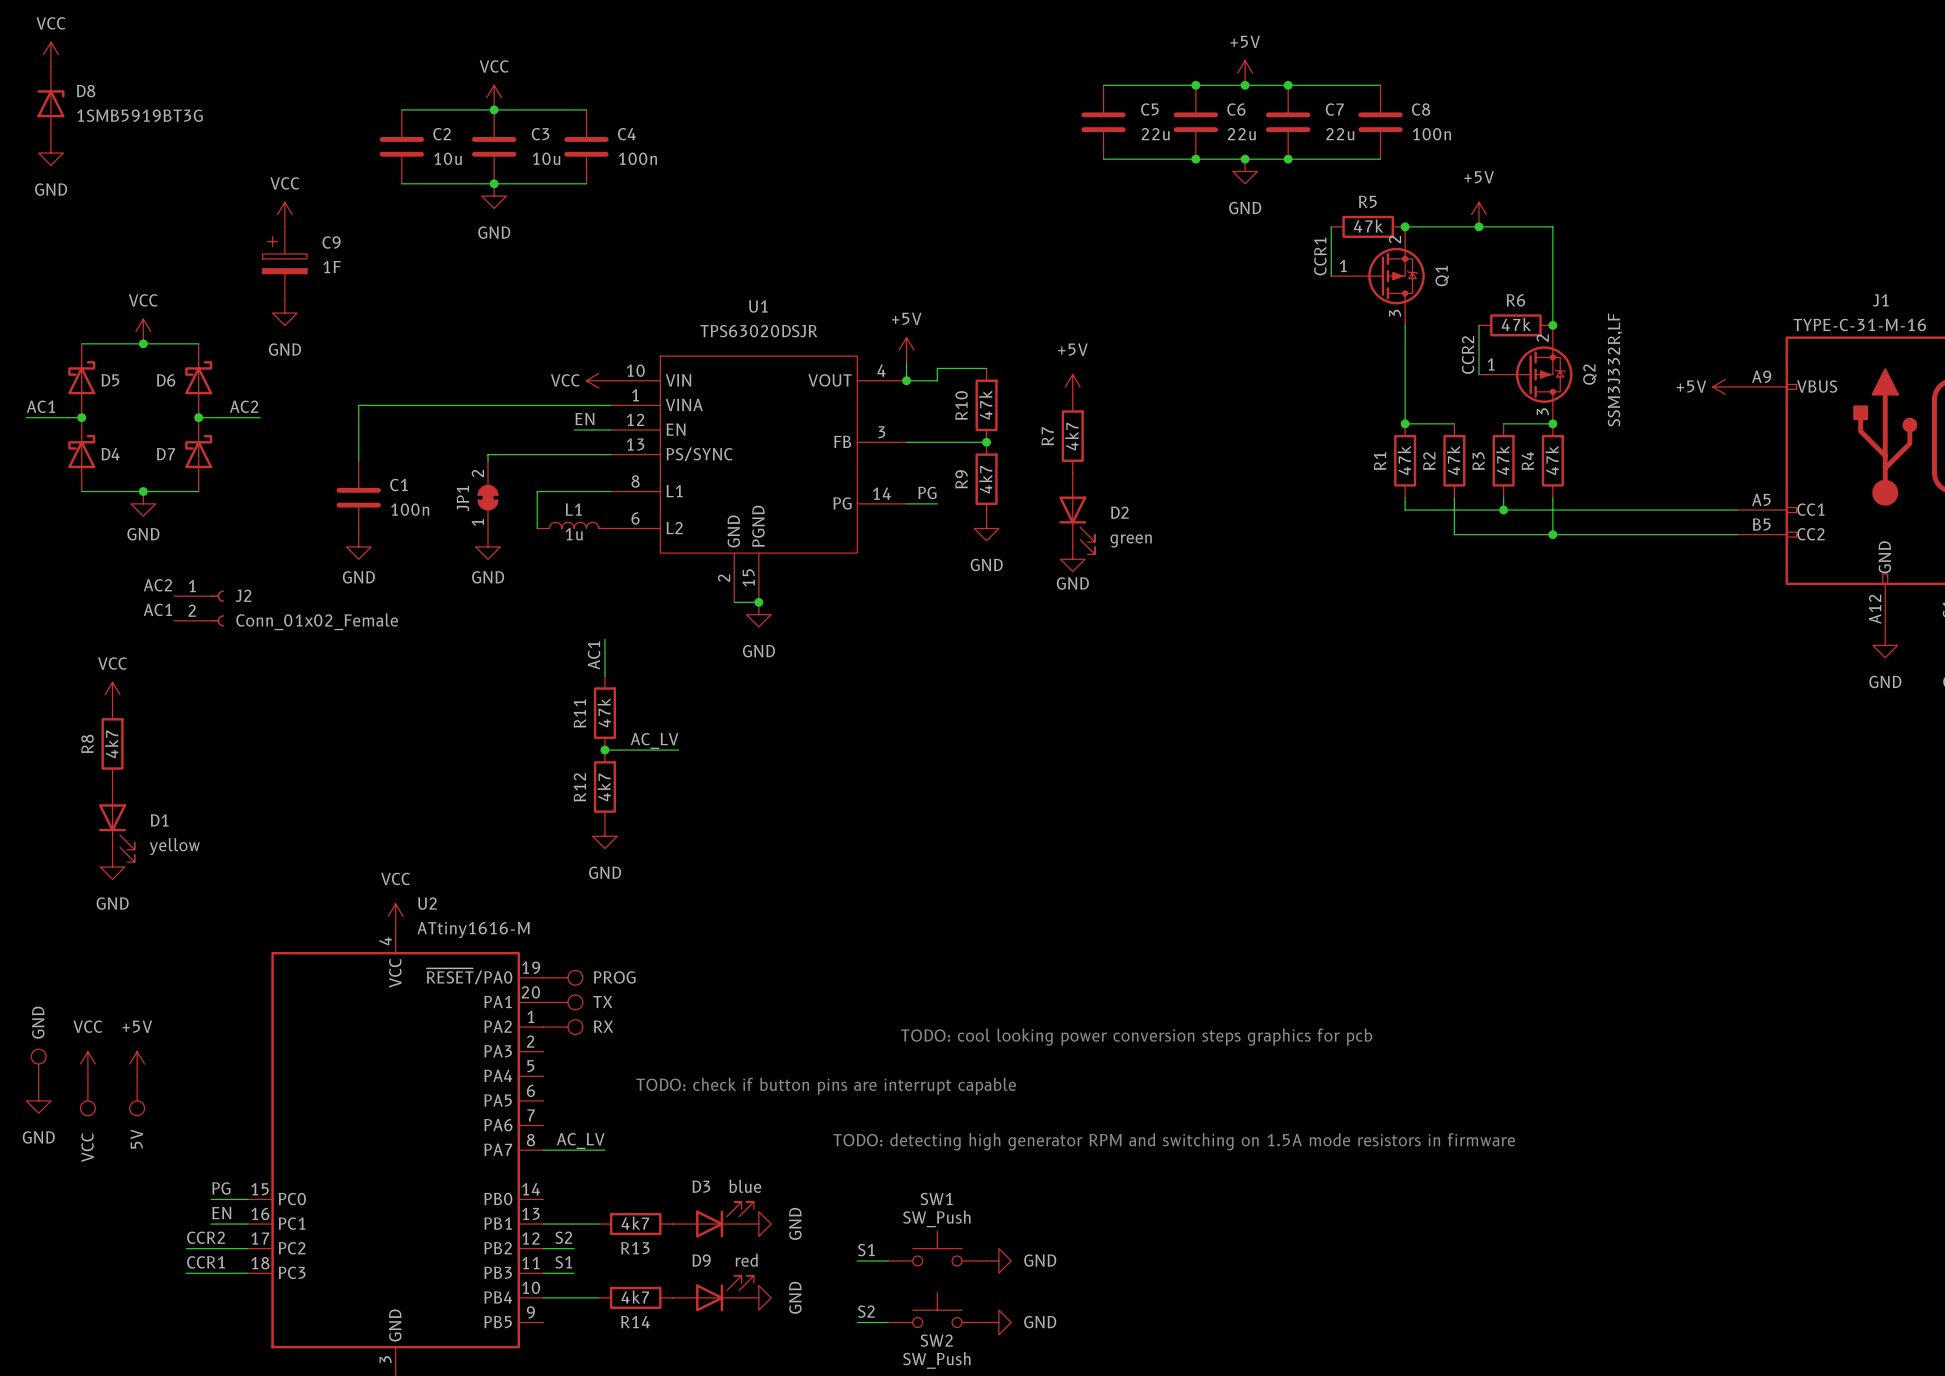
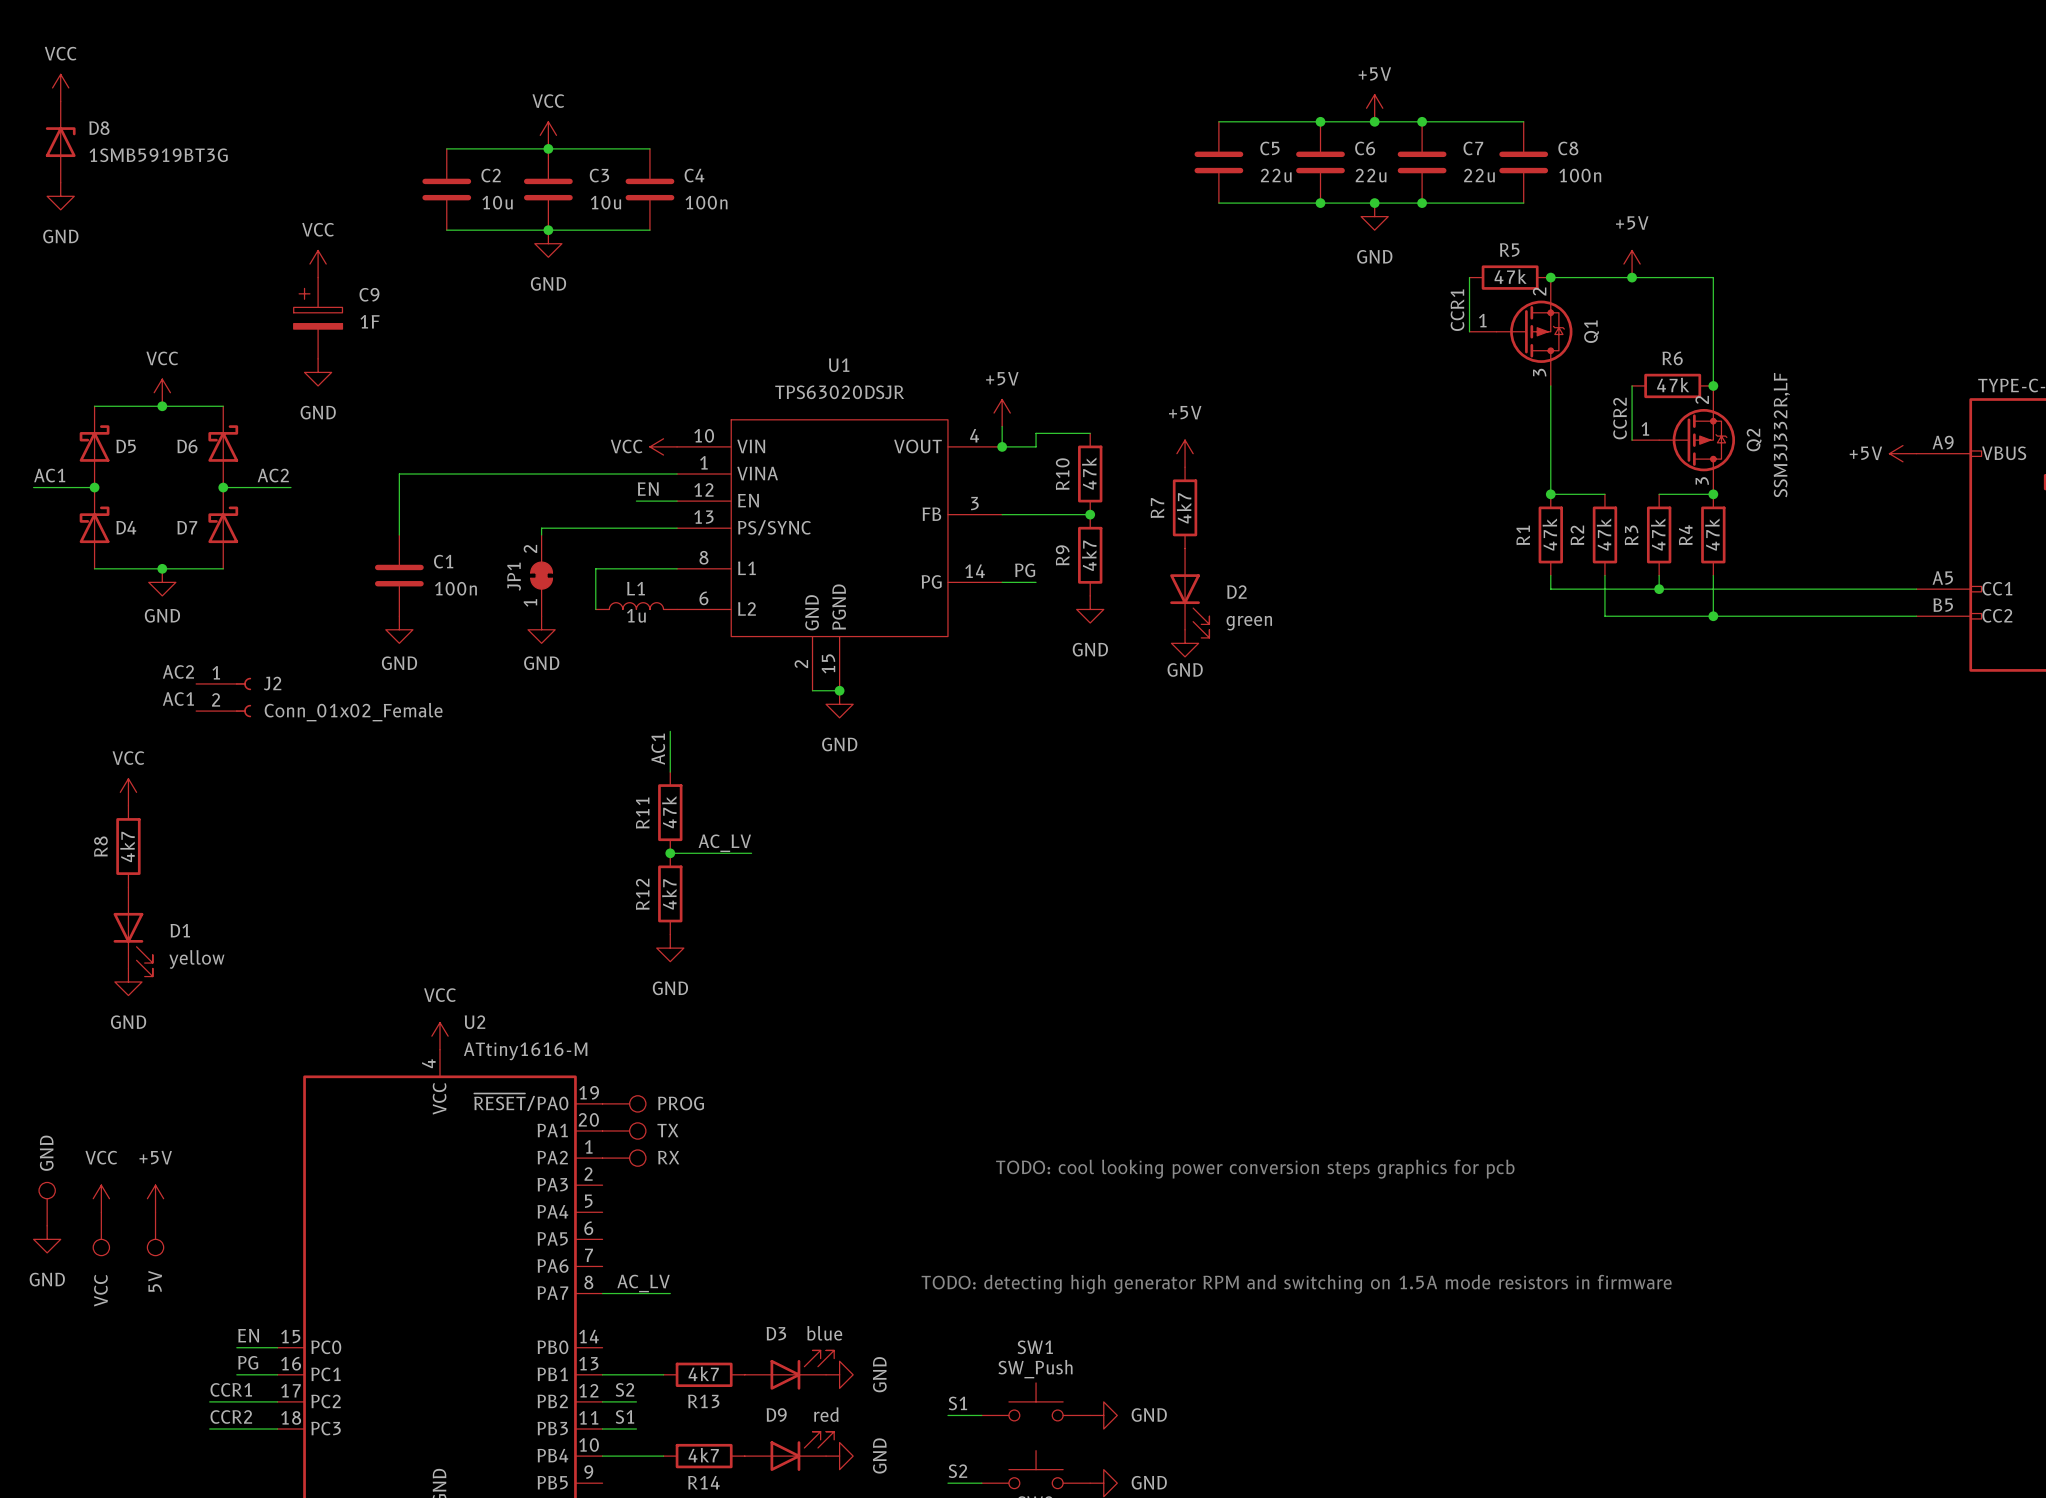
text: TODO: check if button pins are interrupt capable (826, 1086) -> none
label: PG (221, 1188) -> EN (248, 1335)
label: EN (221, 1213) -> PG (248, 1362)
label: CCR2 (206, 1237) -> CCR1 (231, 1389)
label: CCR1 (205, 1262) -> CCR2 (231, 1417)

